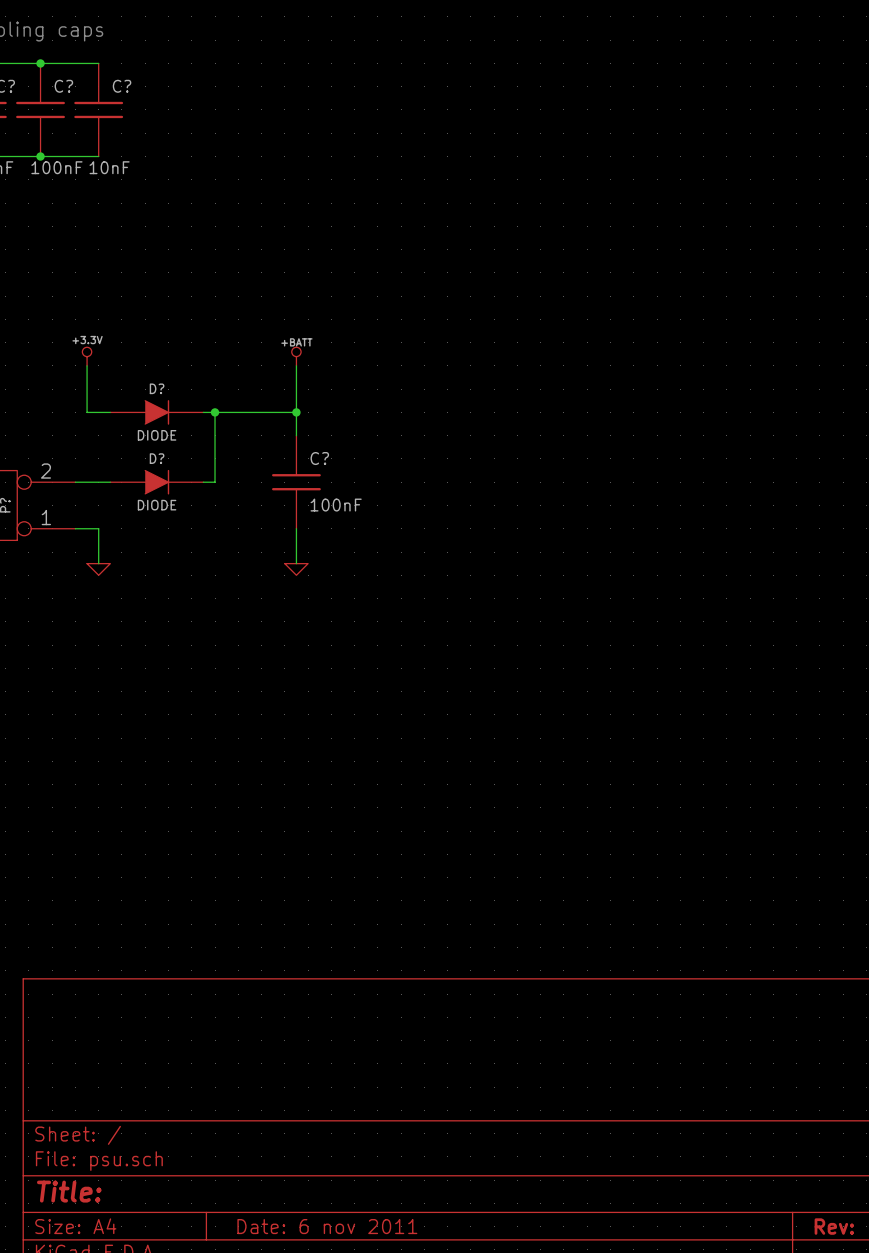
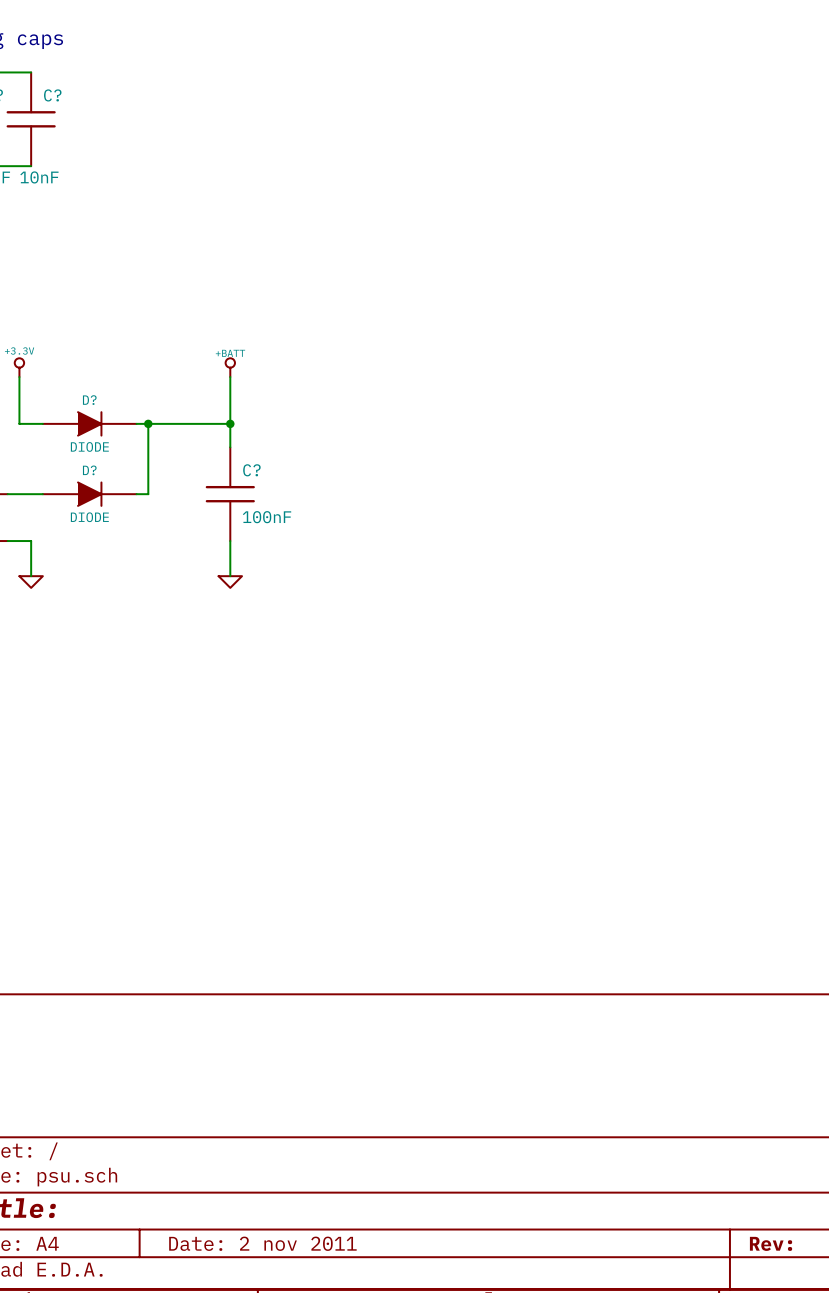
title block: Date: 6 nov 2011 (327, 1226) -> Date: 2 nov 2011 (262, 1243)

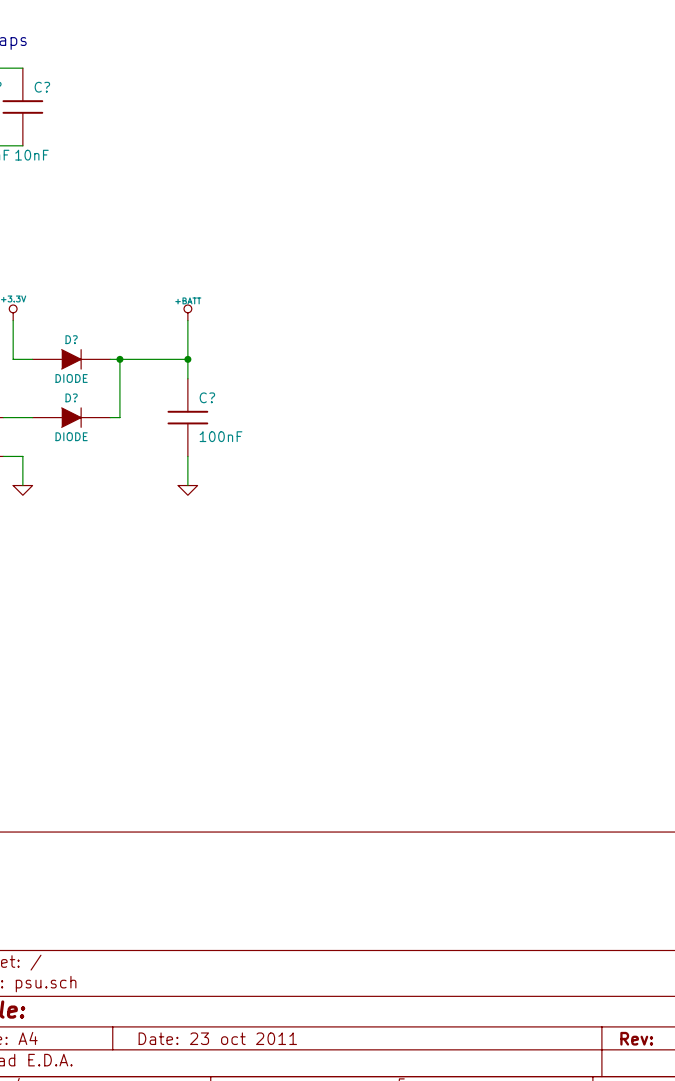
title block: Date: 2 nov 2011 (262, 1243) -> Date: 23 oct 2011 (217, 1038)

